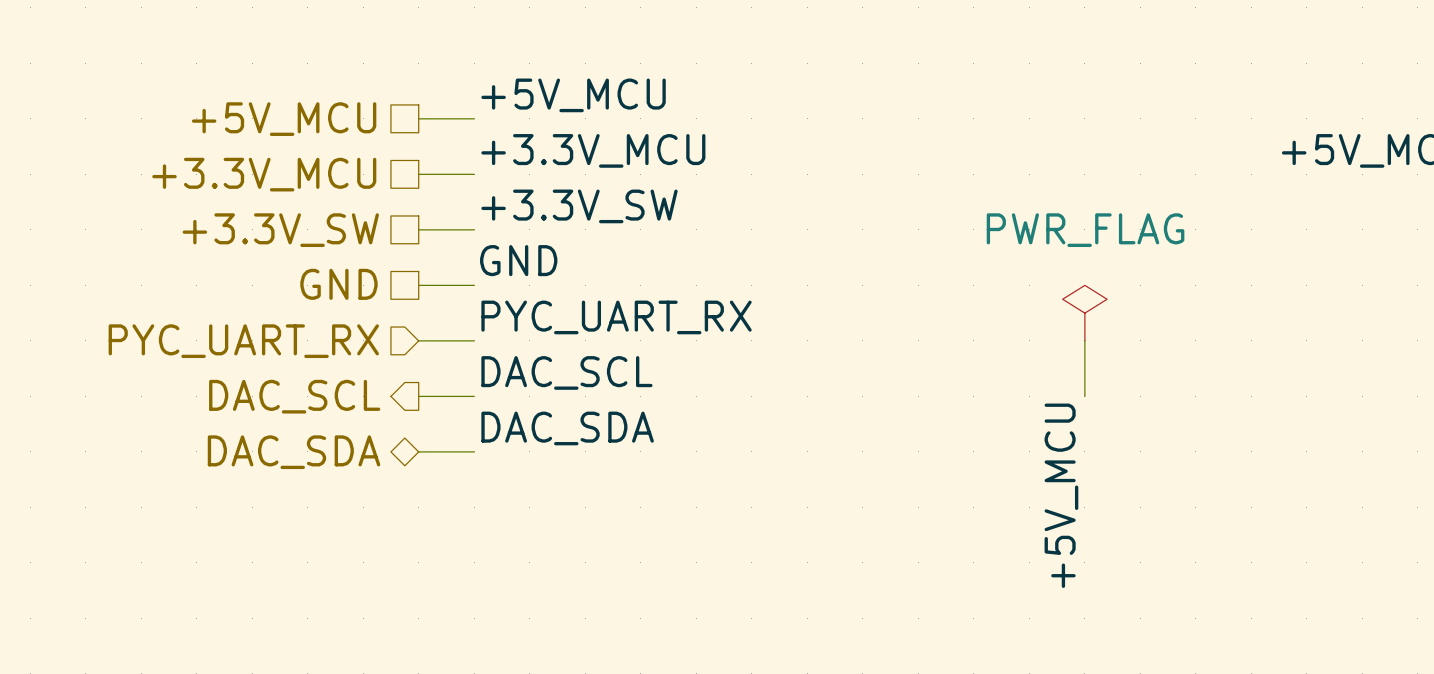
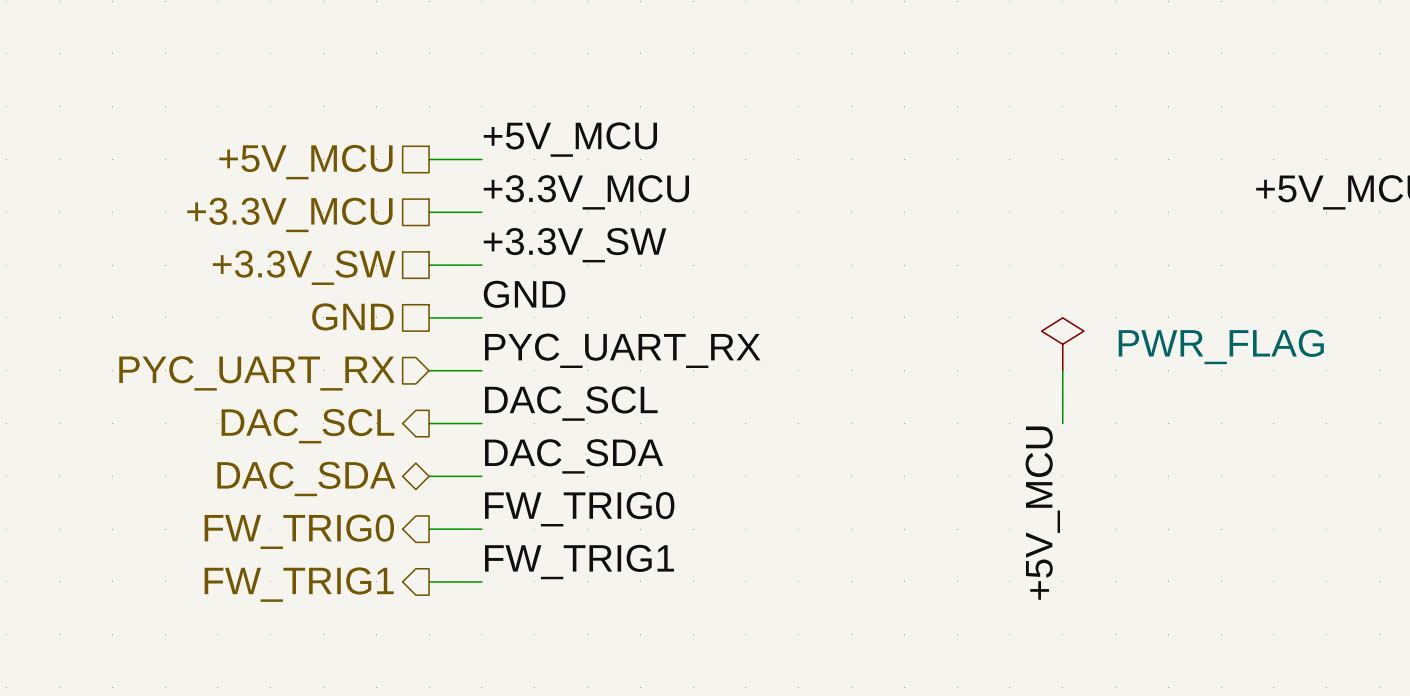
power symbol text position: PWR_FLAG (1085, 230) -> PWR_FLAG (1221, 346)
label: none -> FW_TRIG0 (579, 509)
hierarchical label: none -> FW_TRIG0 (299, 531)
wire: none -> (429, 529) (481, 529)
label: none -> FW_TRIG1 (579, 562)
wire: none -> (429, 581) (481, 581)
hierarchical label: none -> FW_TRIG1 (299, 584)

